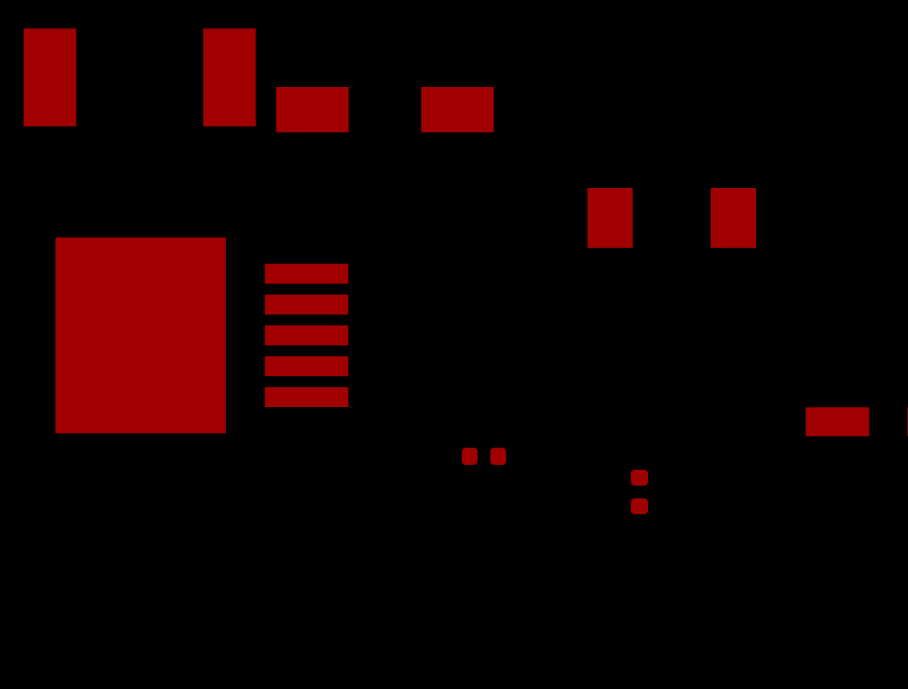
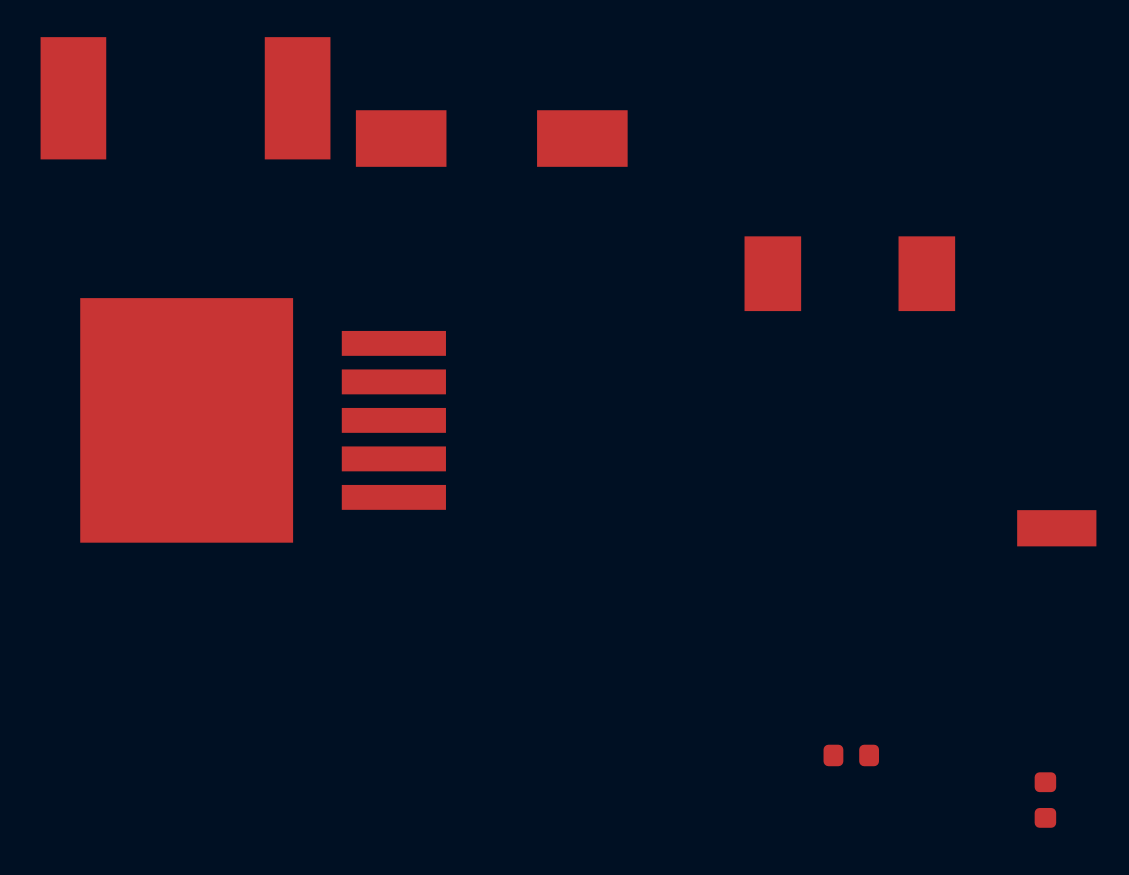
part: (483, 456) -> none
part rotation: 0° (639, 492) -> 90° clockwise (851, 755)
part position: (639, 492) -> (851, 755)
part: none -> (1045, 800)

